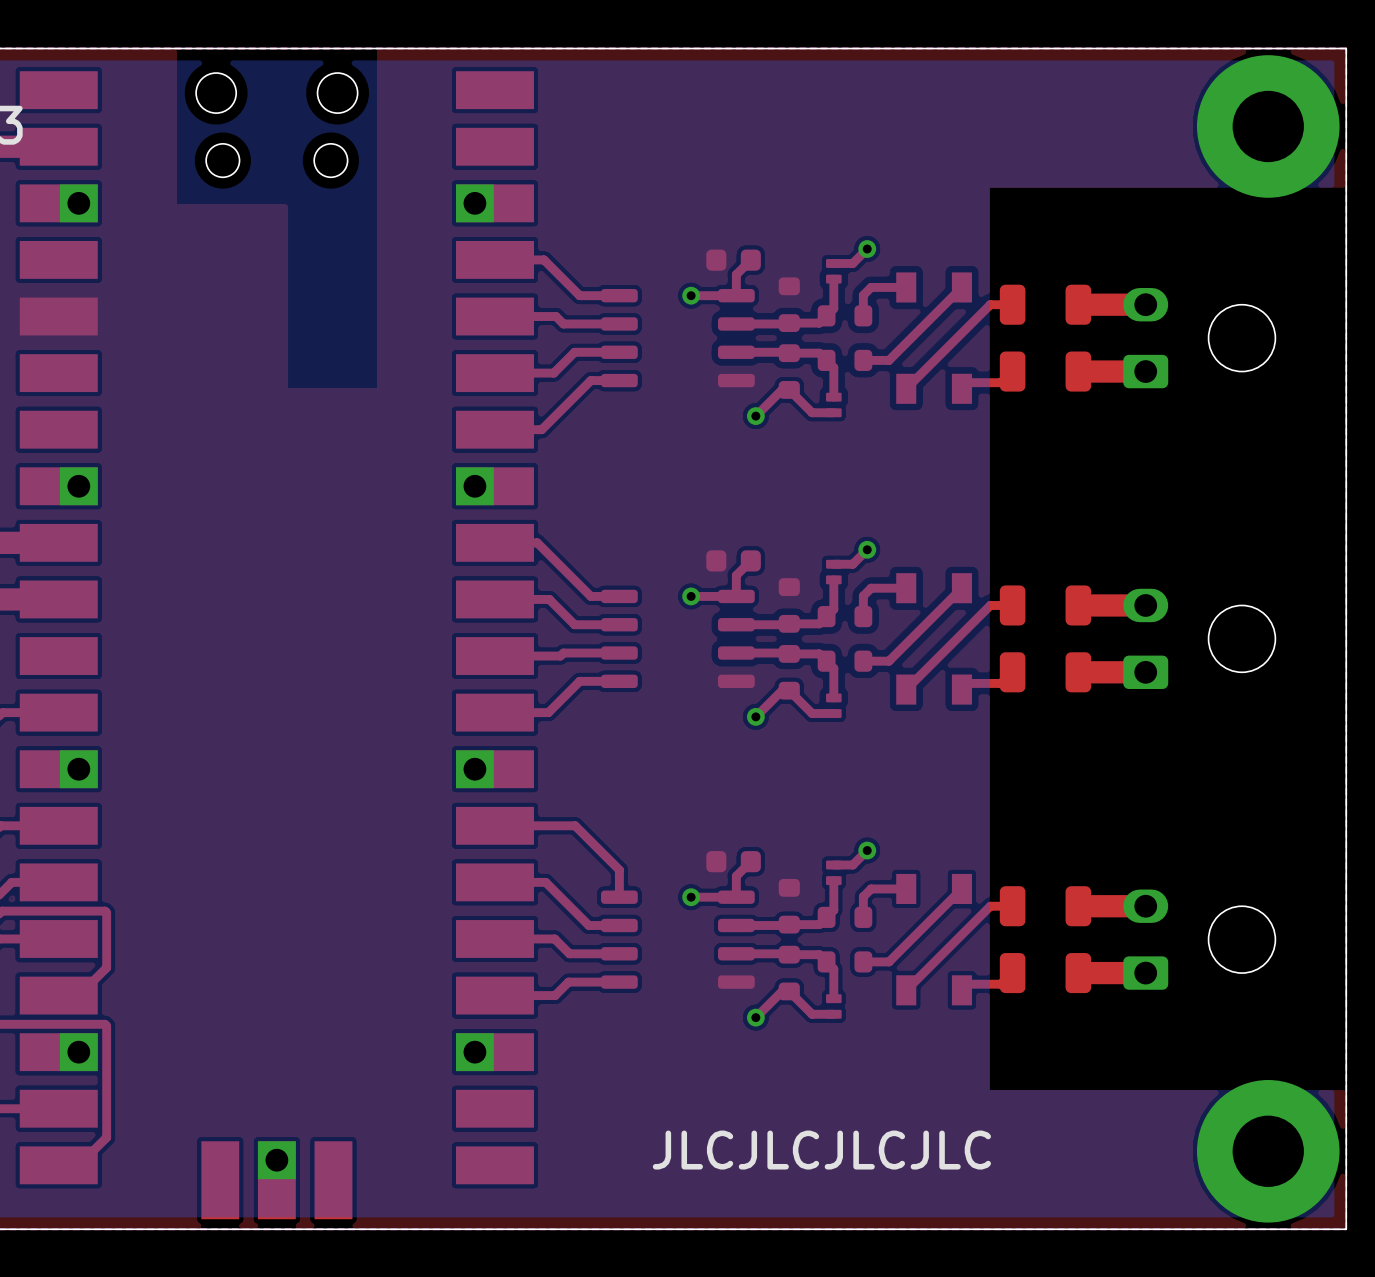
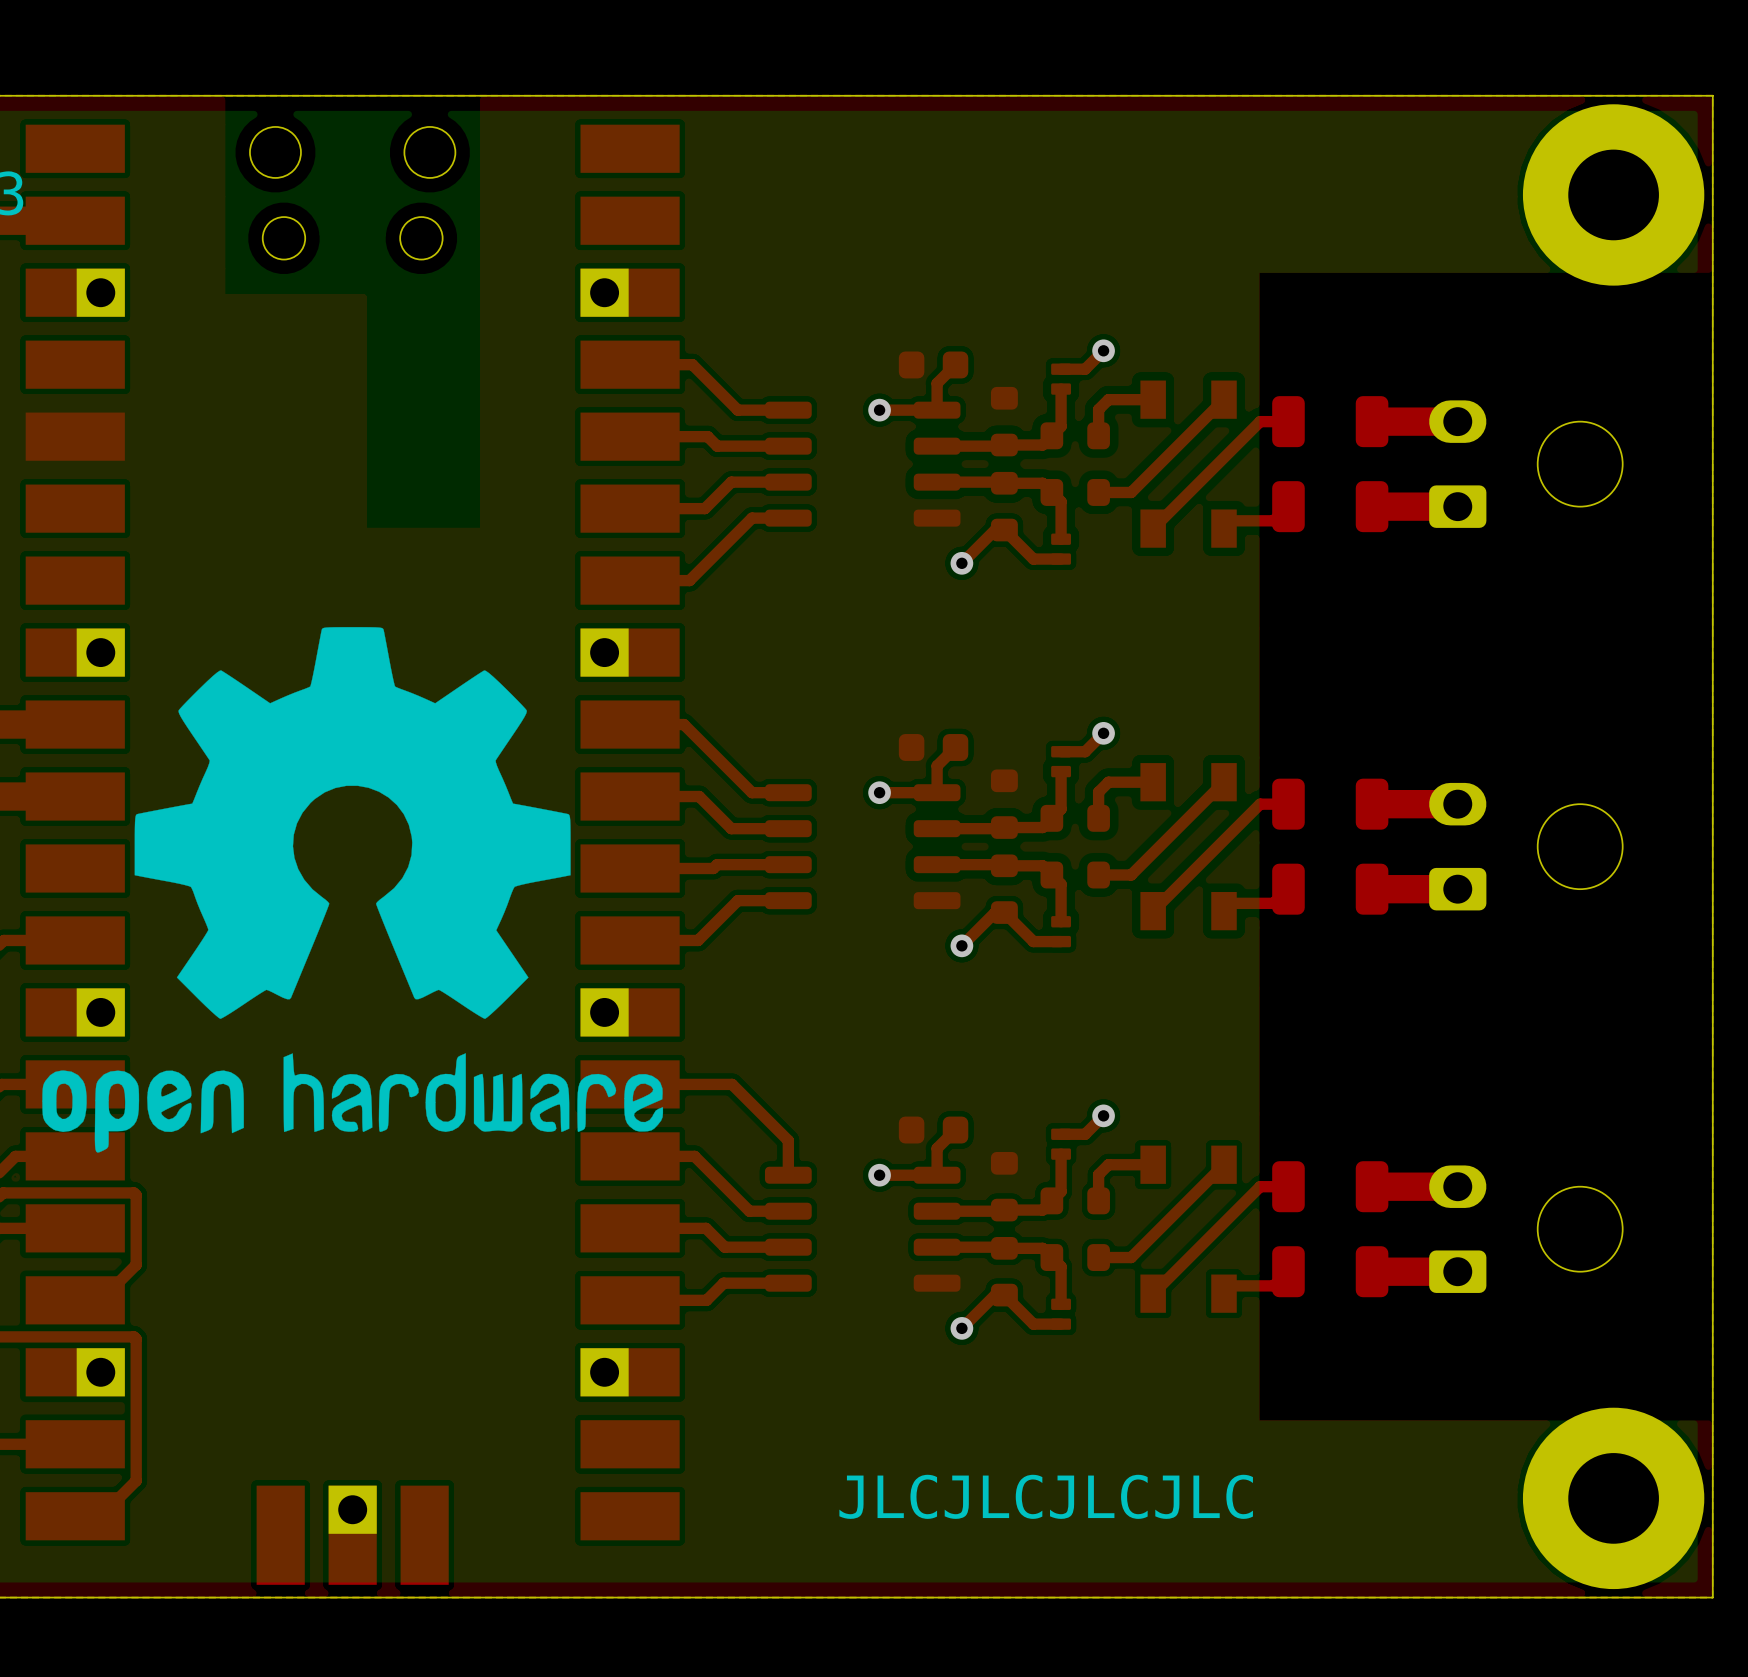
drawing: none -> [42, 627, 664, 1153]

